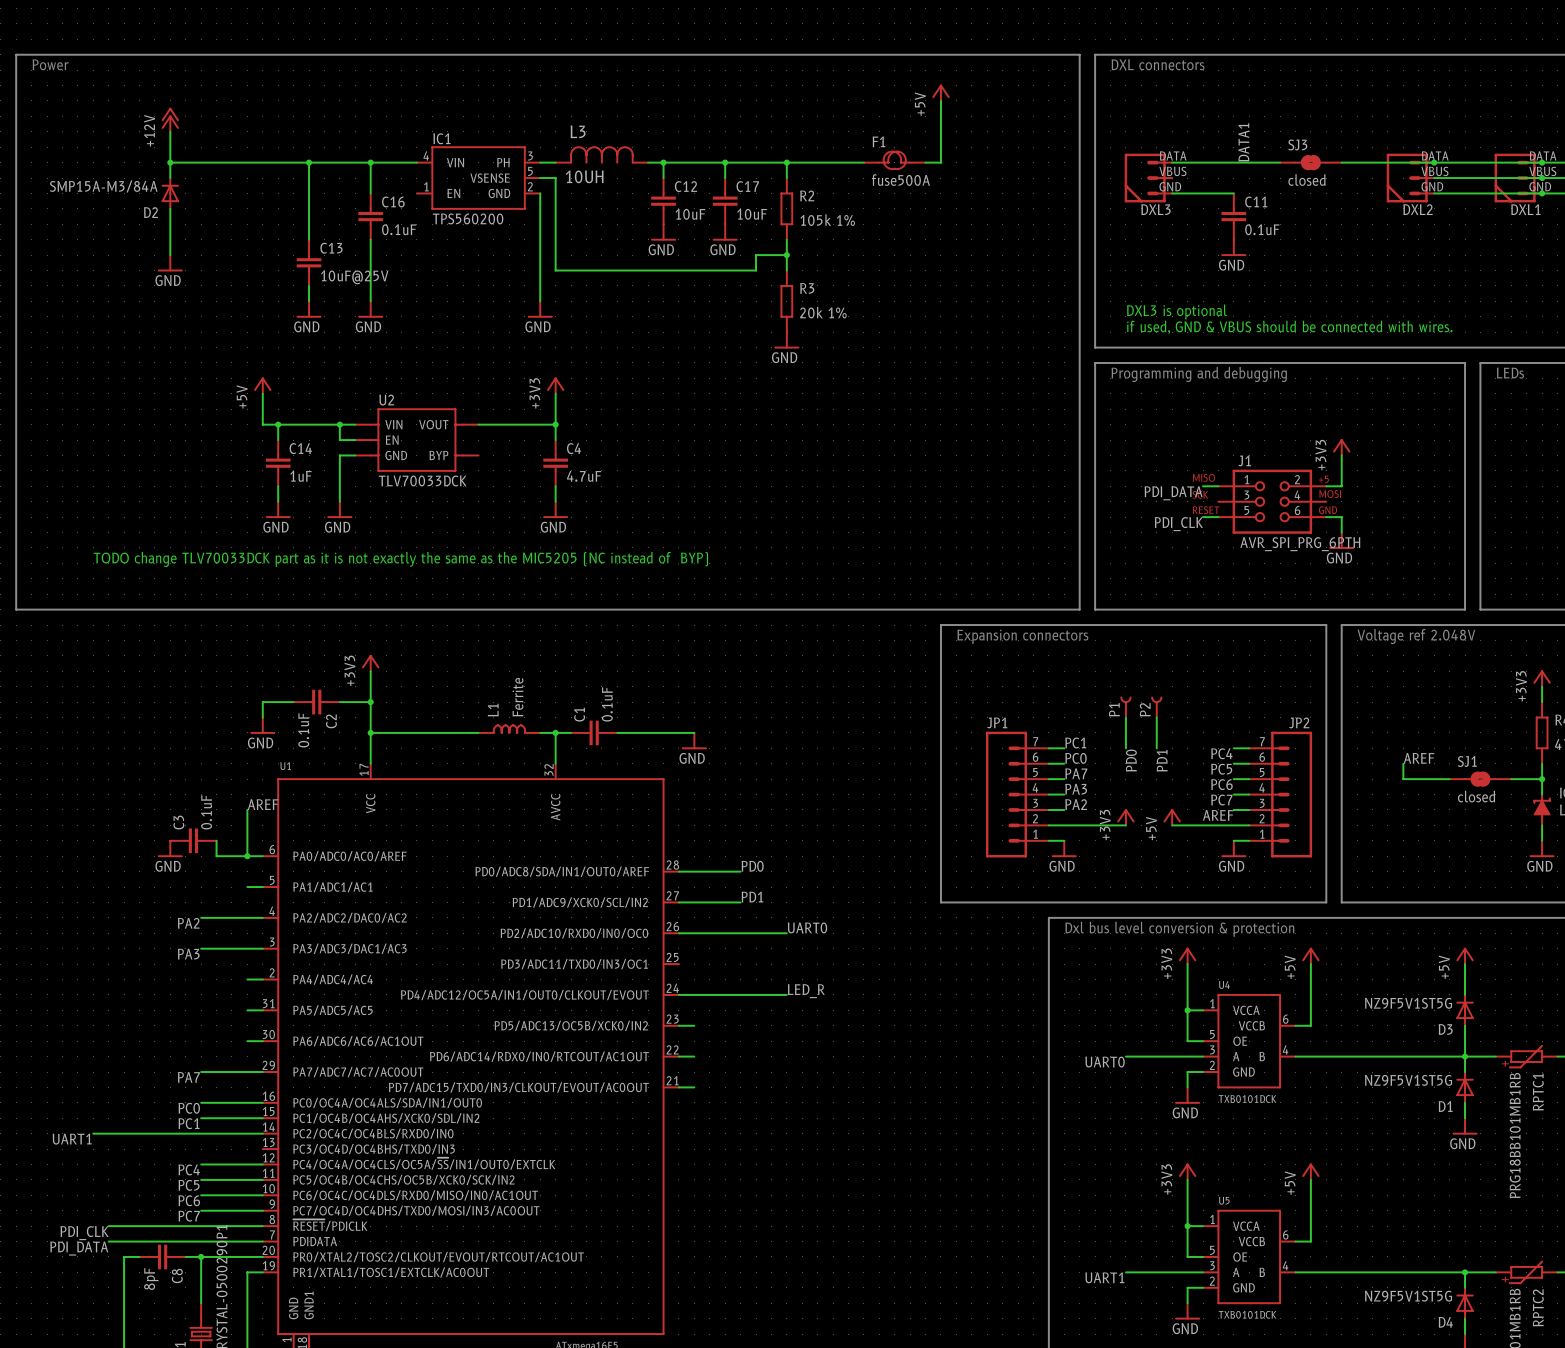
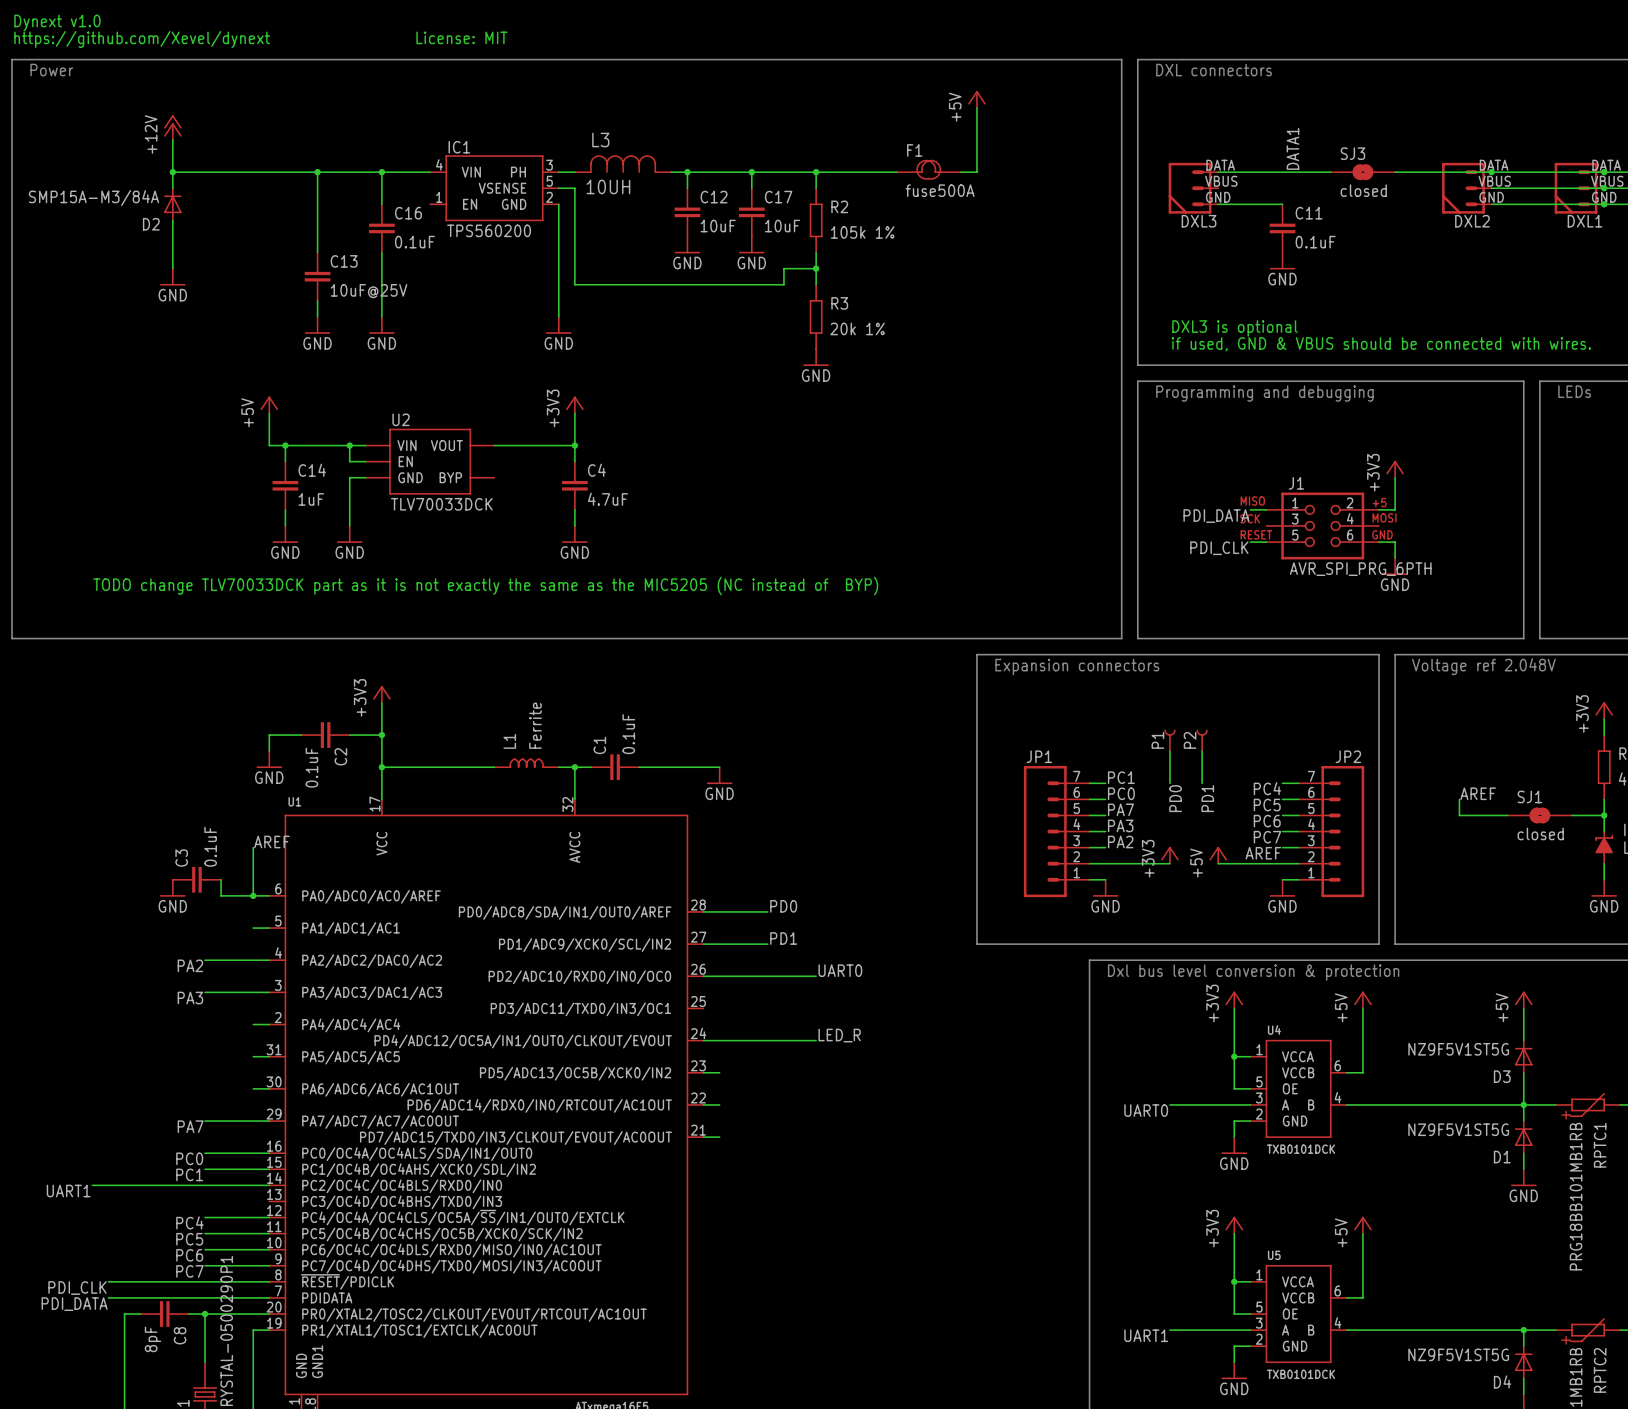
text: none -> Dynext v1.0 (57, 22)
text: none -> License: MIT (461, 37)
text: none -> https://github.com/Xevel/dynext (142, 39)

